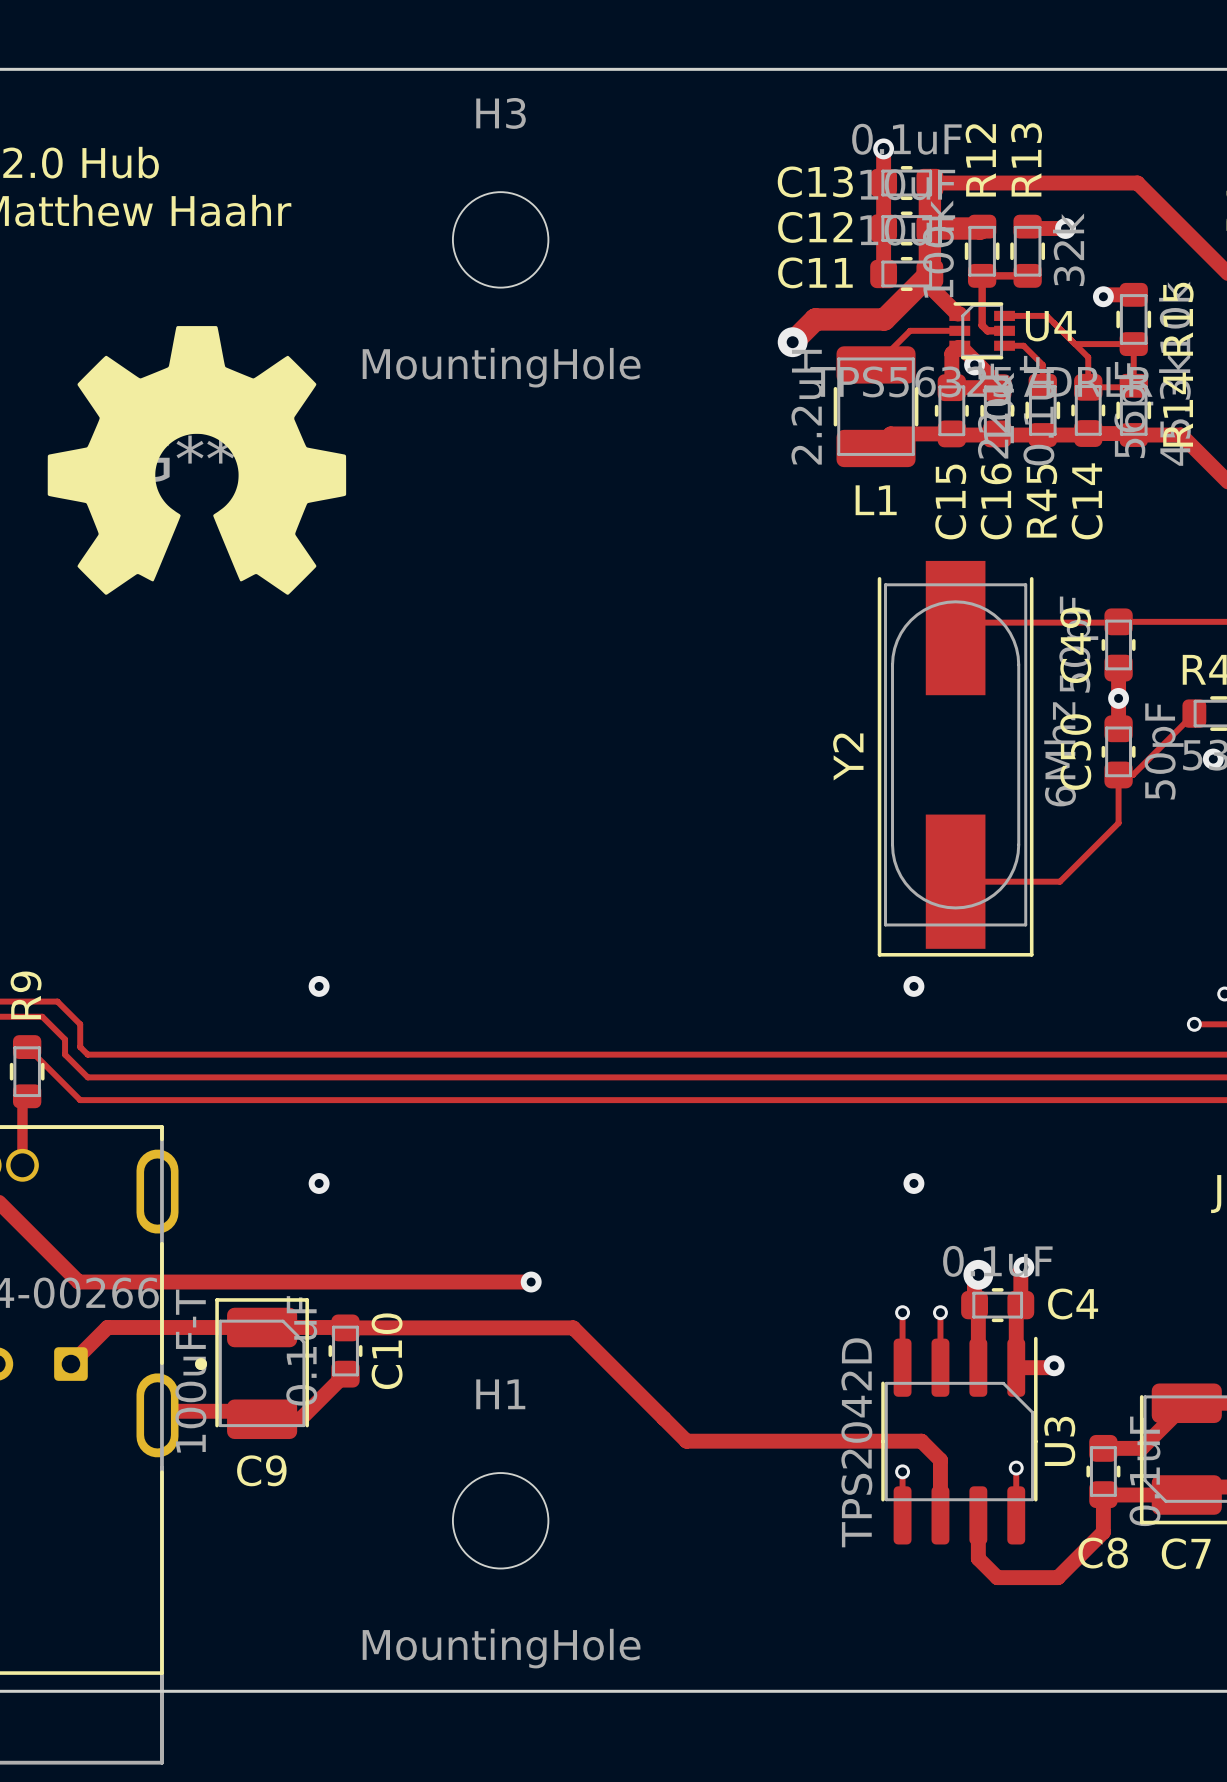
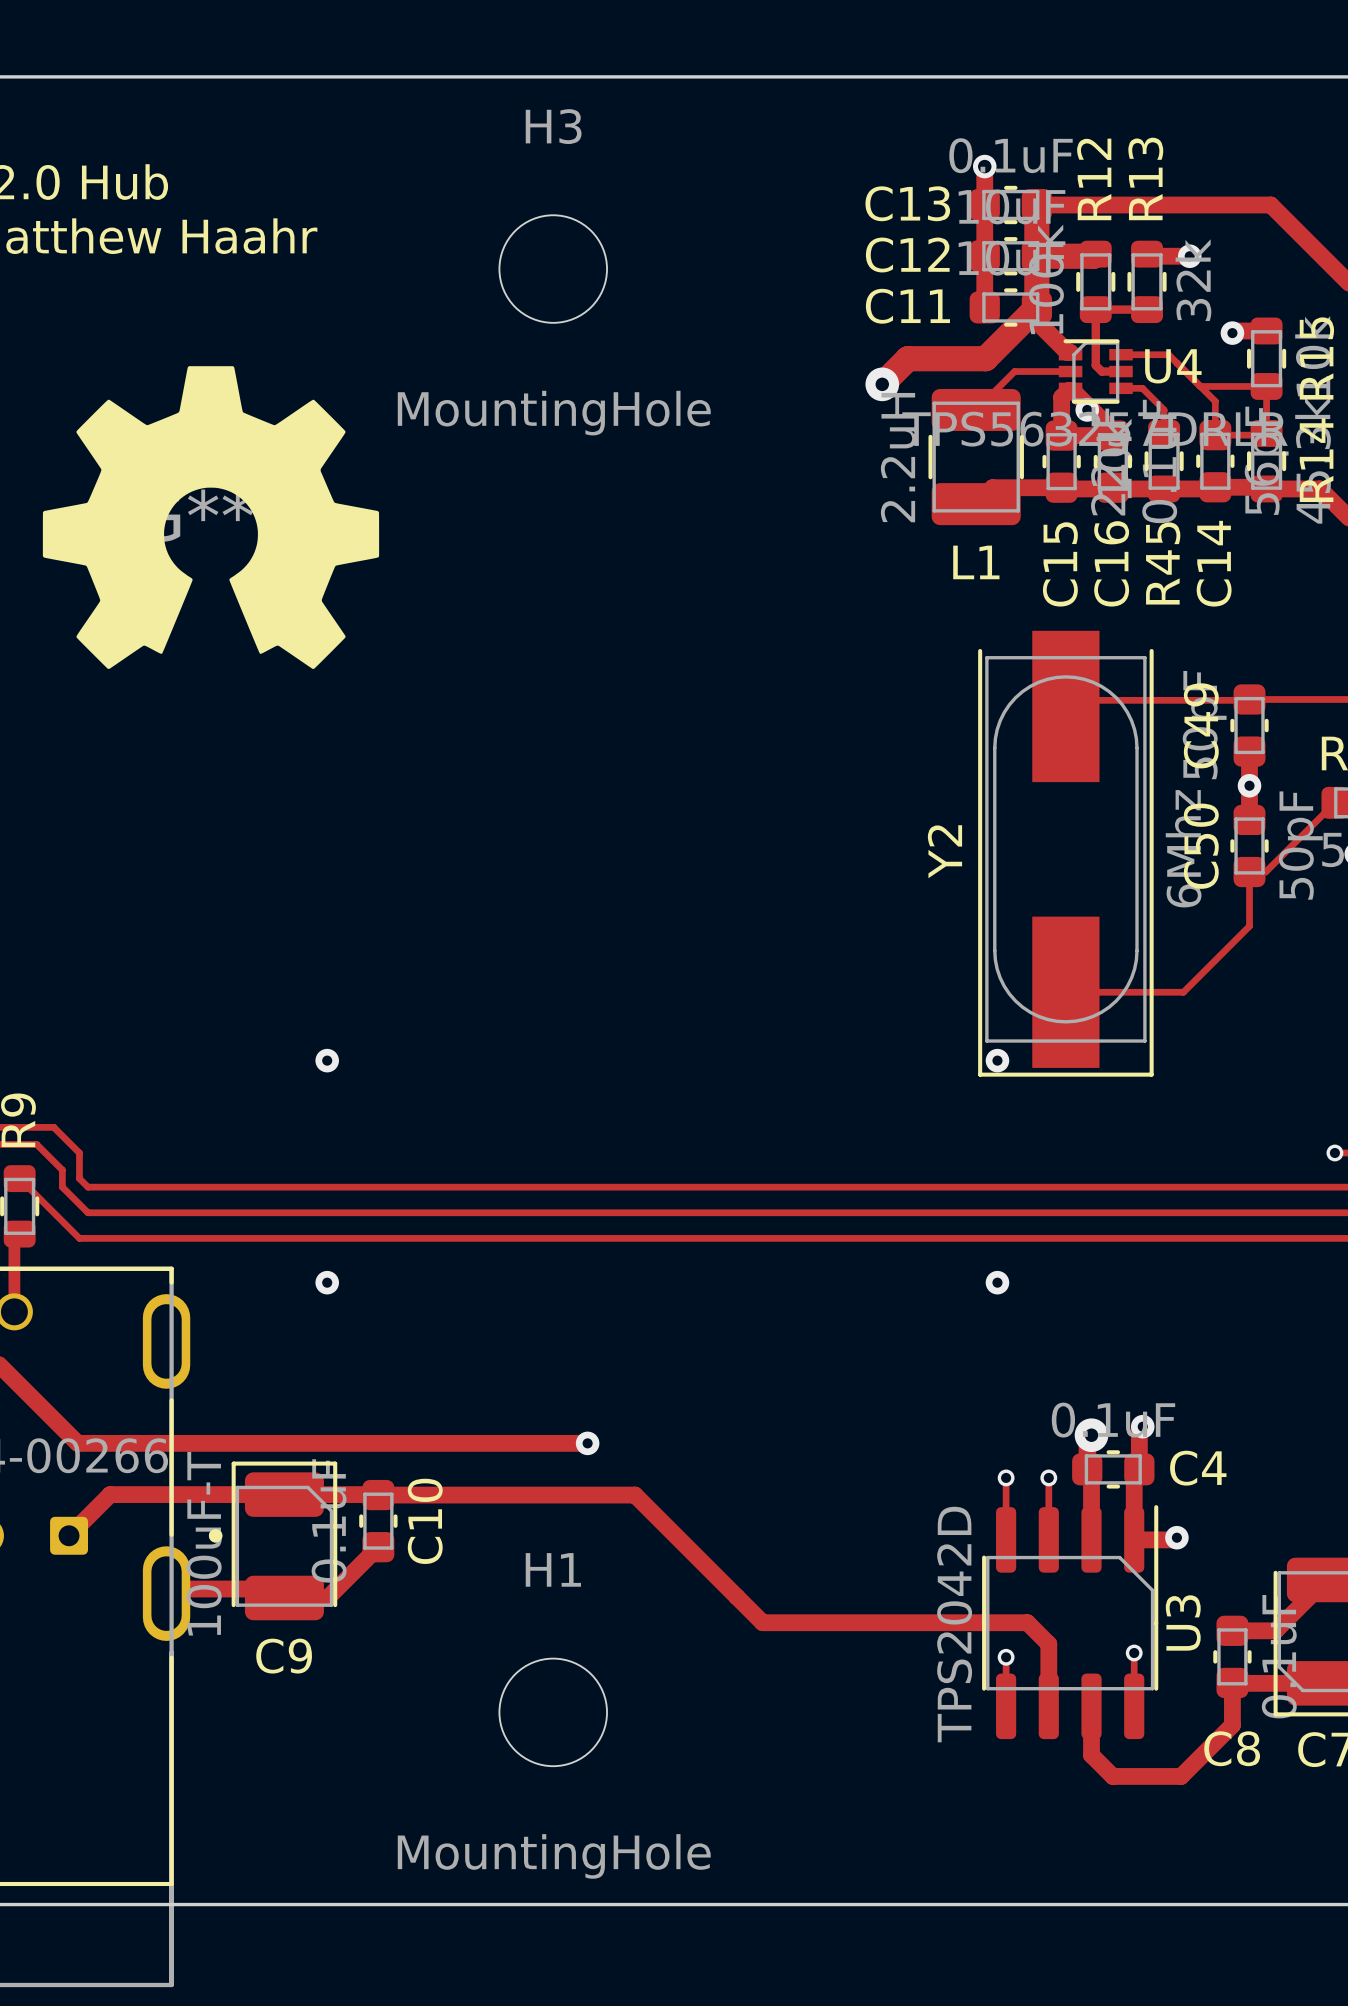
via position: (319, 986) -> (327, 1060)
via position: (913, 986) -> (997, 1060)
via position: (319, 1183) -> (327, 1282)
via position: (913, 1183) -> (997, 1282)

